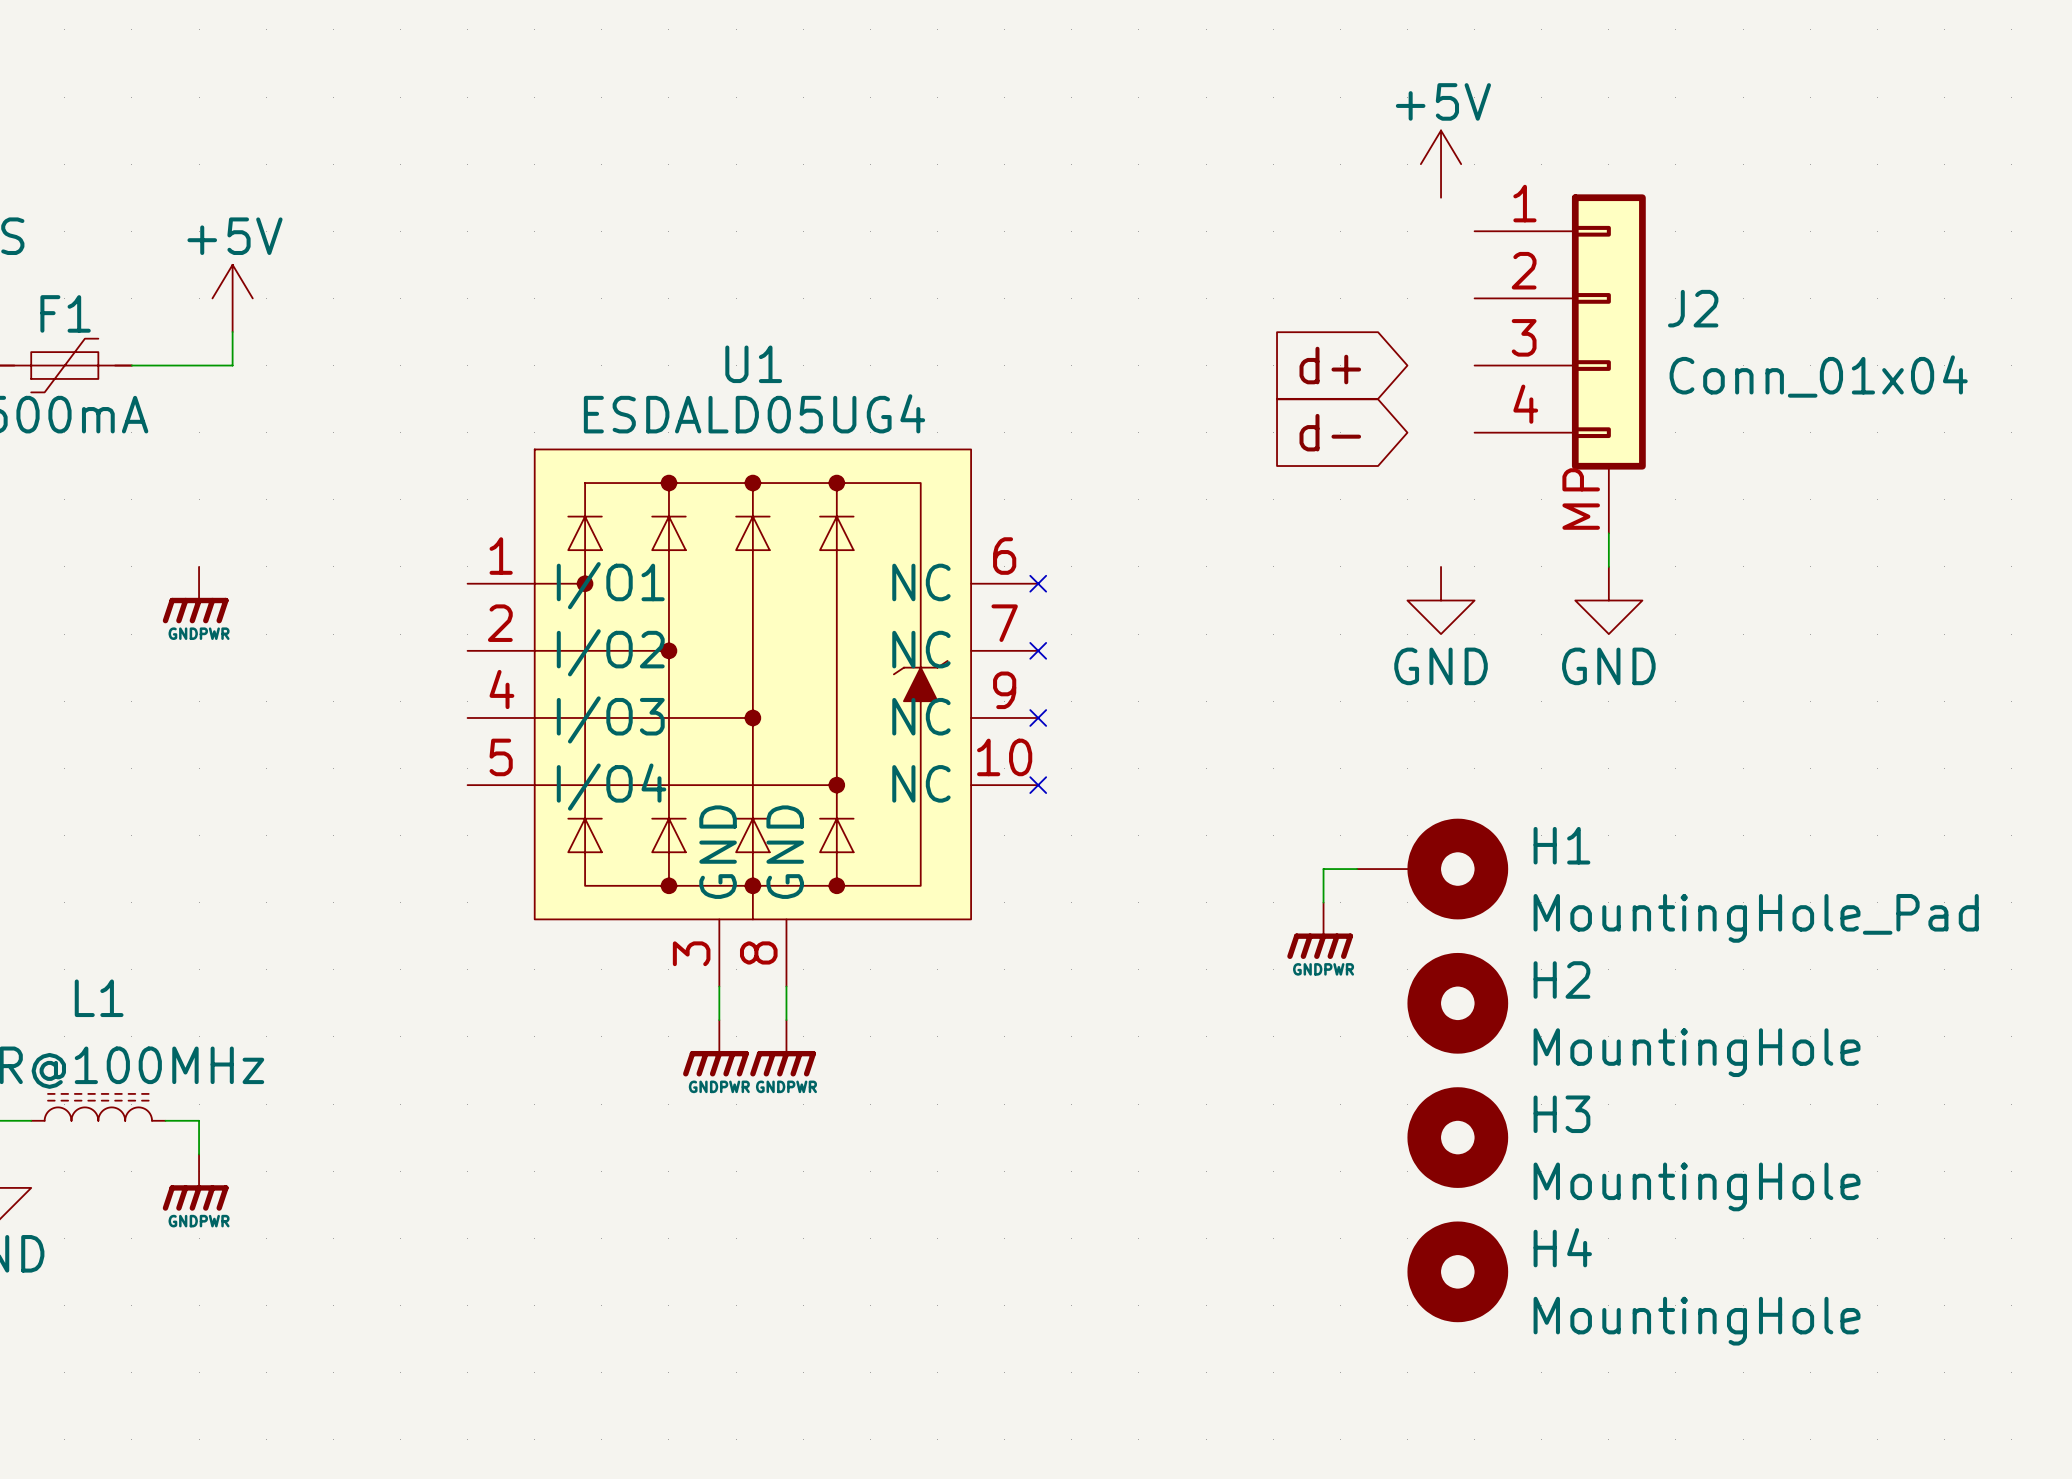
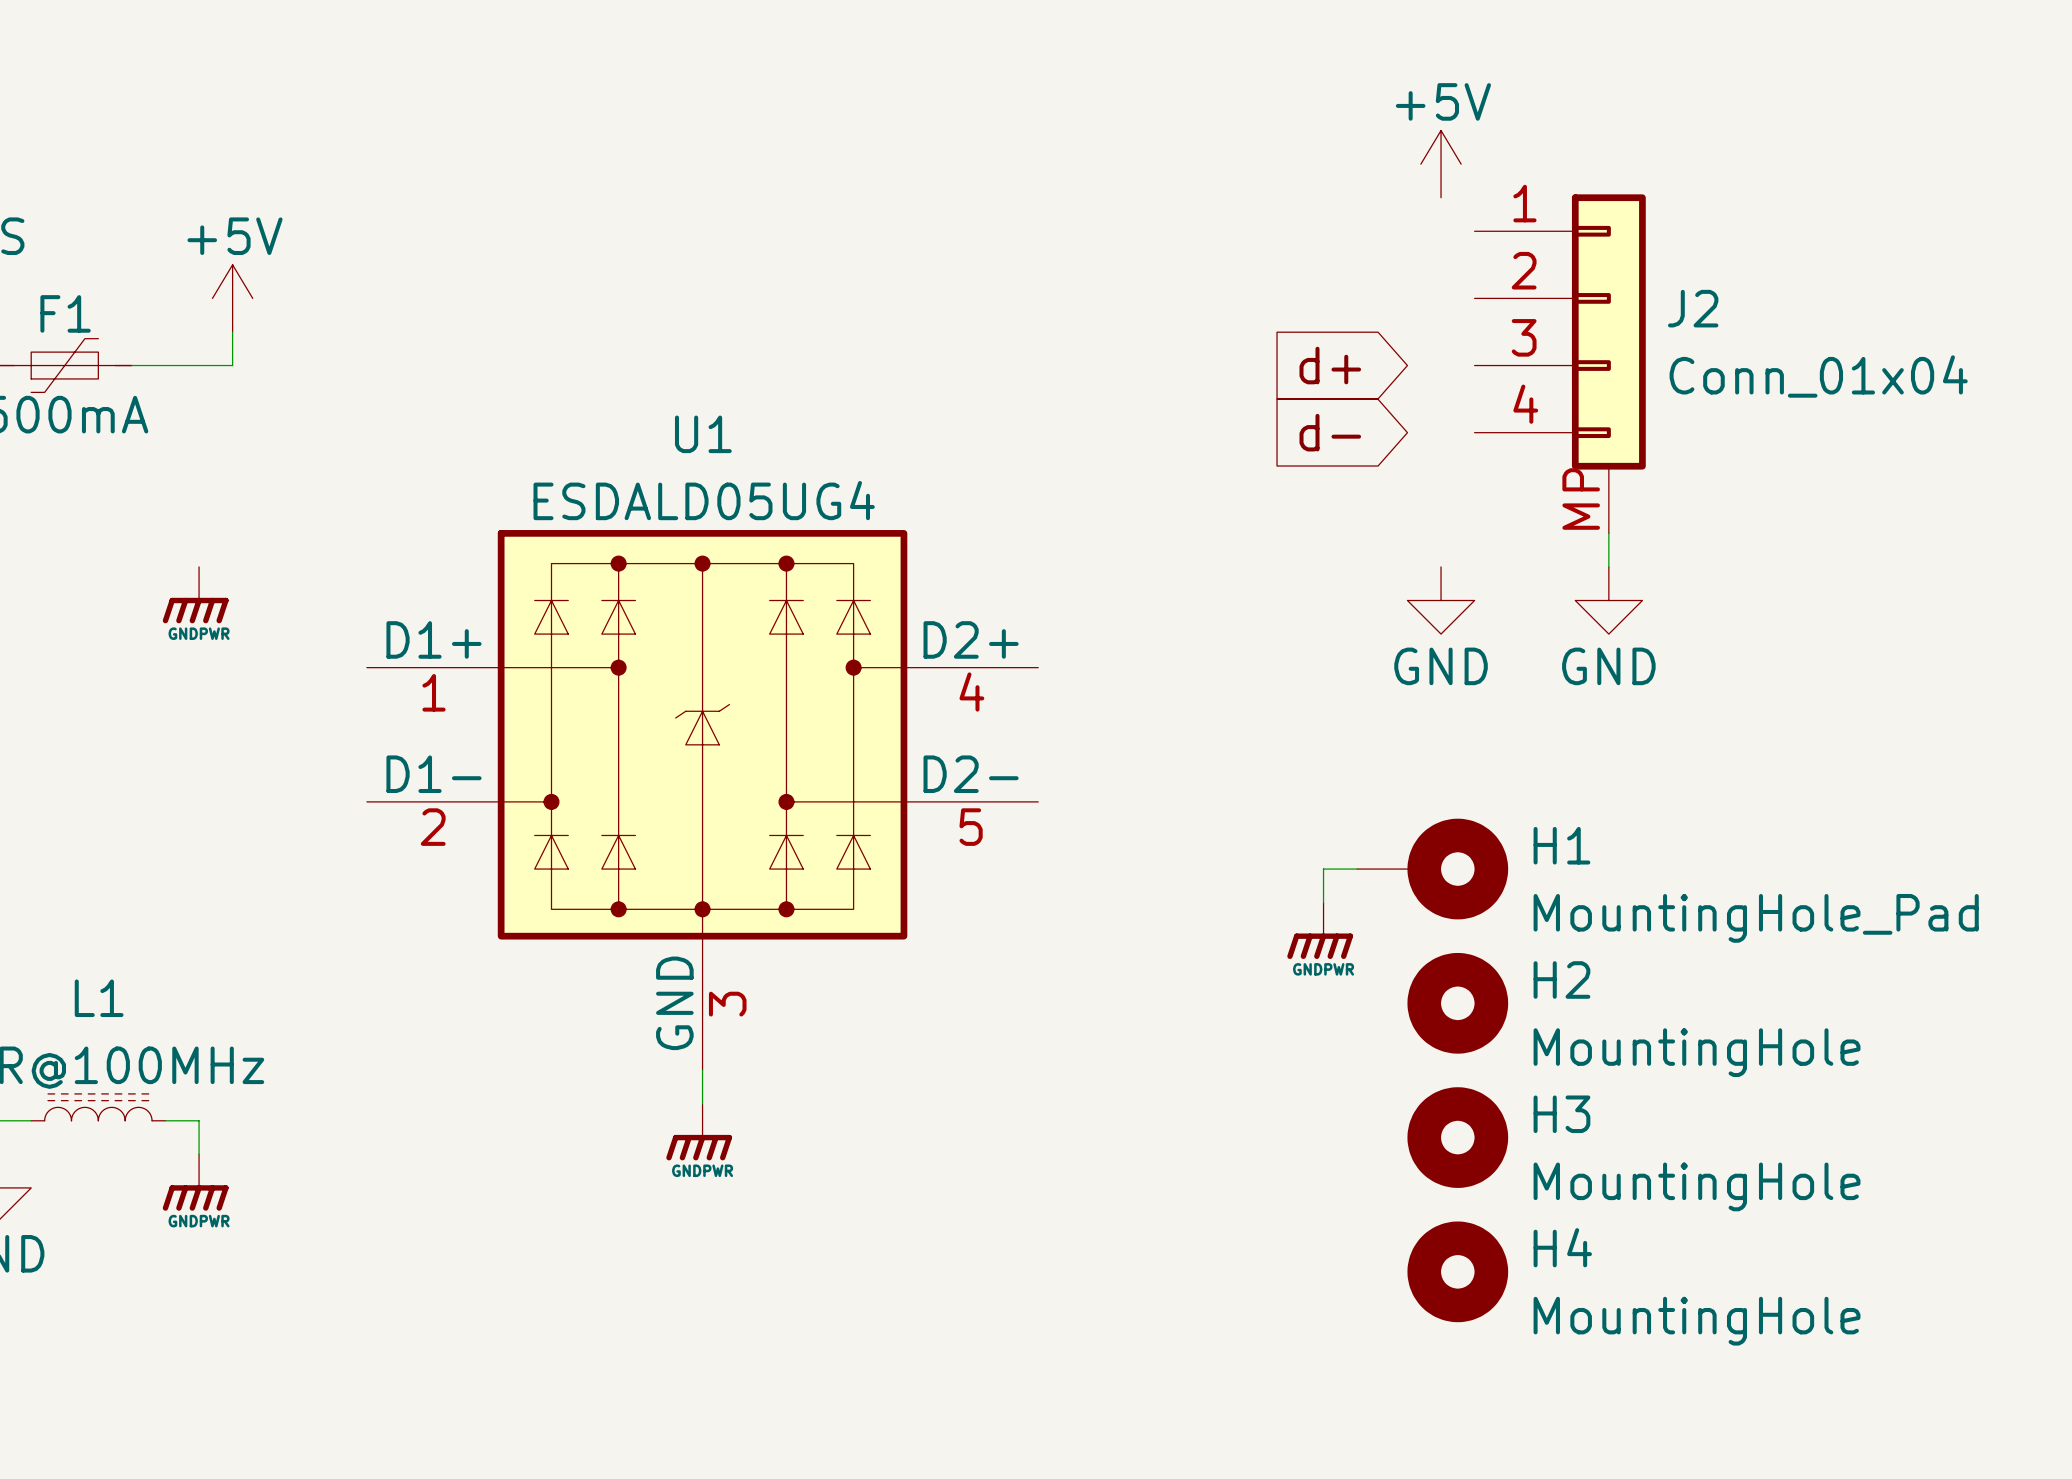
U1 symbol: [467, 449, 1047, 987] -> [366, 530, 1039, 1071]
wire: (719, 986) (719, 1020) -> (702, 1070) (702, 1104)
wire: (786, 986) (786, 1020) -> none
power symbol: GNDPWR (715, 1048) -> none
power symbol: GNDPWR (783, 1048) -> none
power symbol: none -> GNDPWR (699, 1132)

